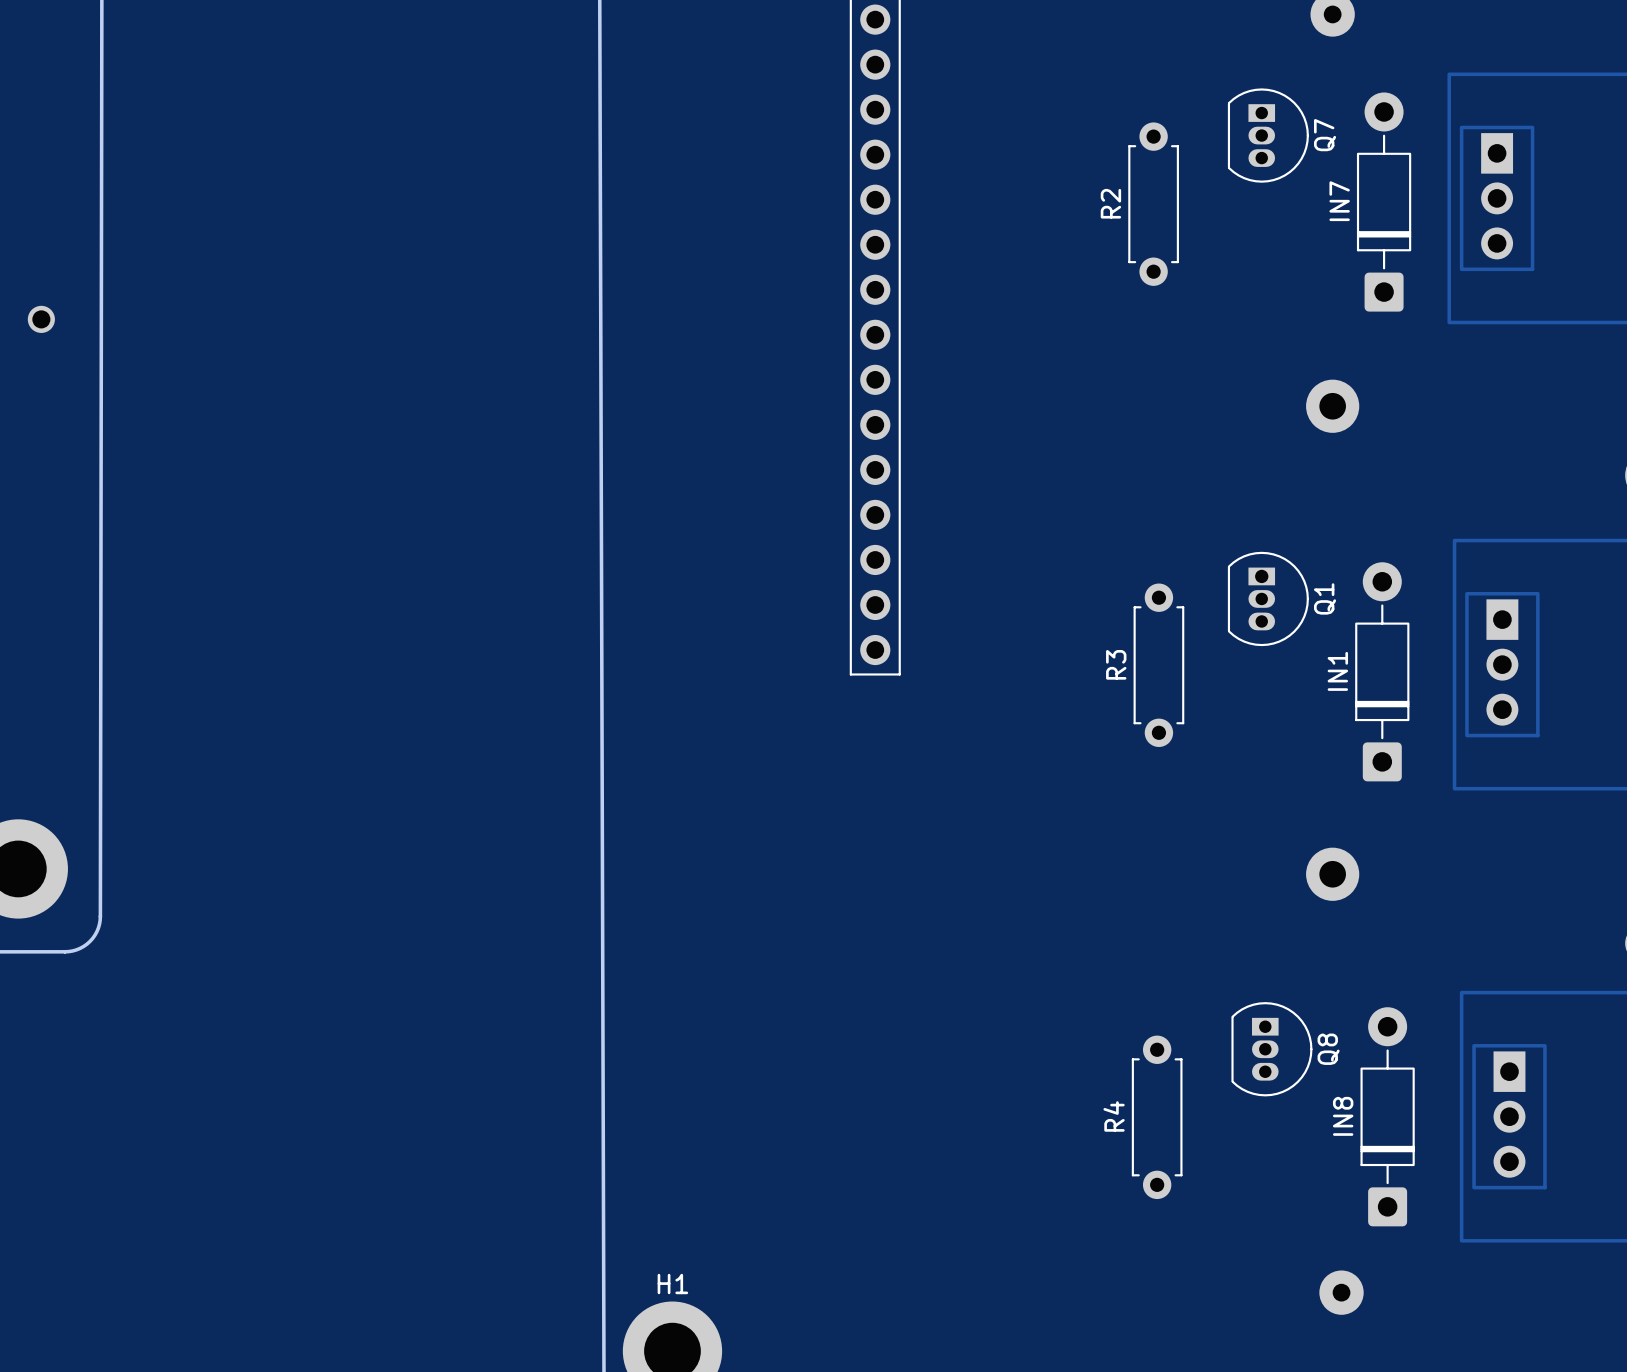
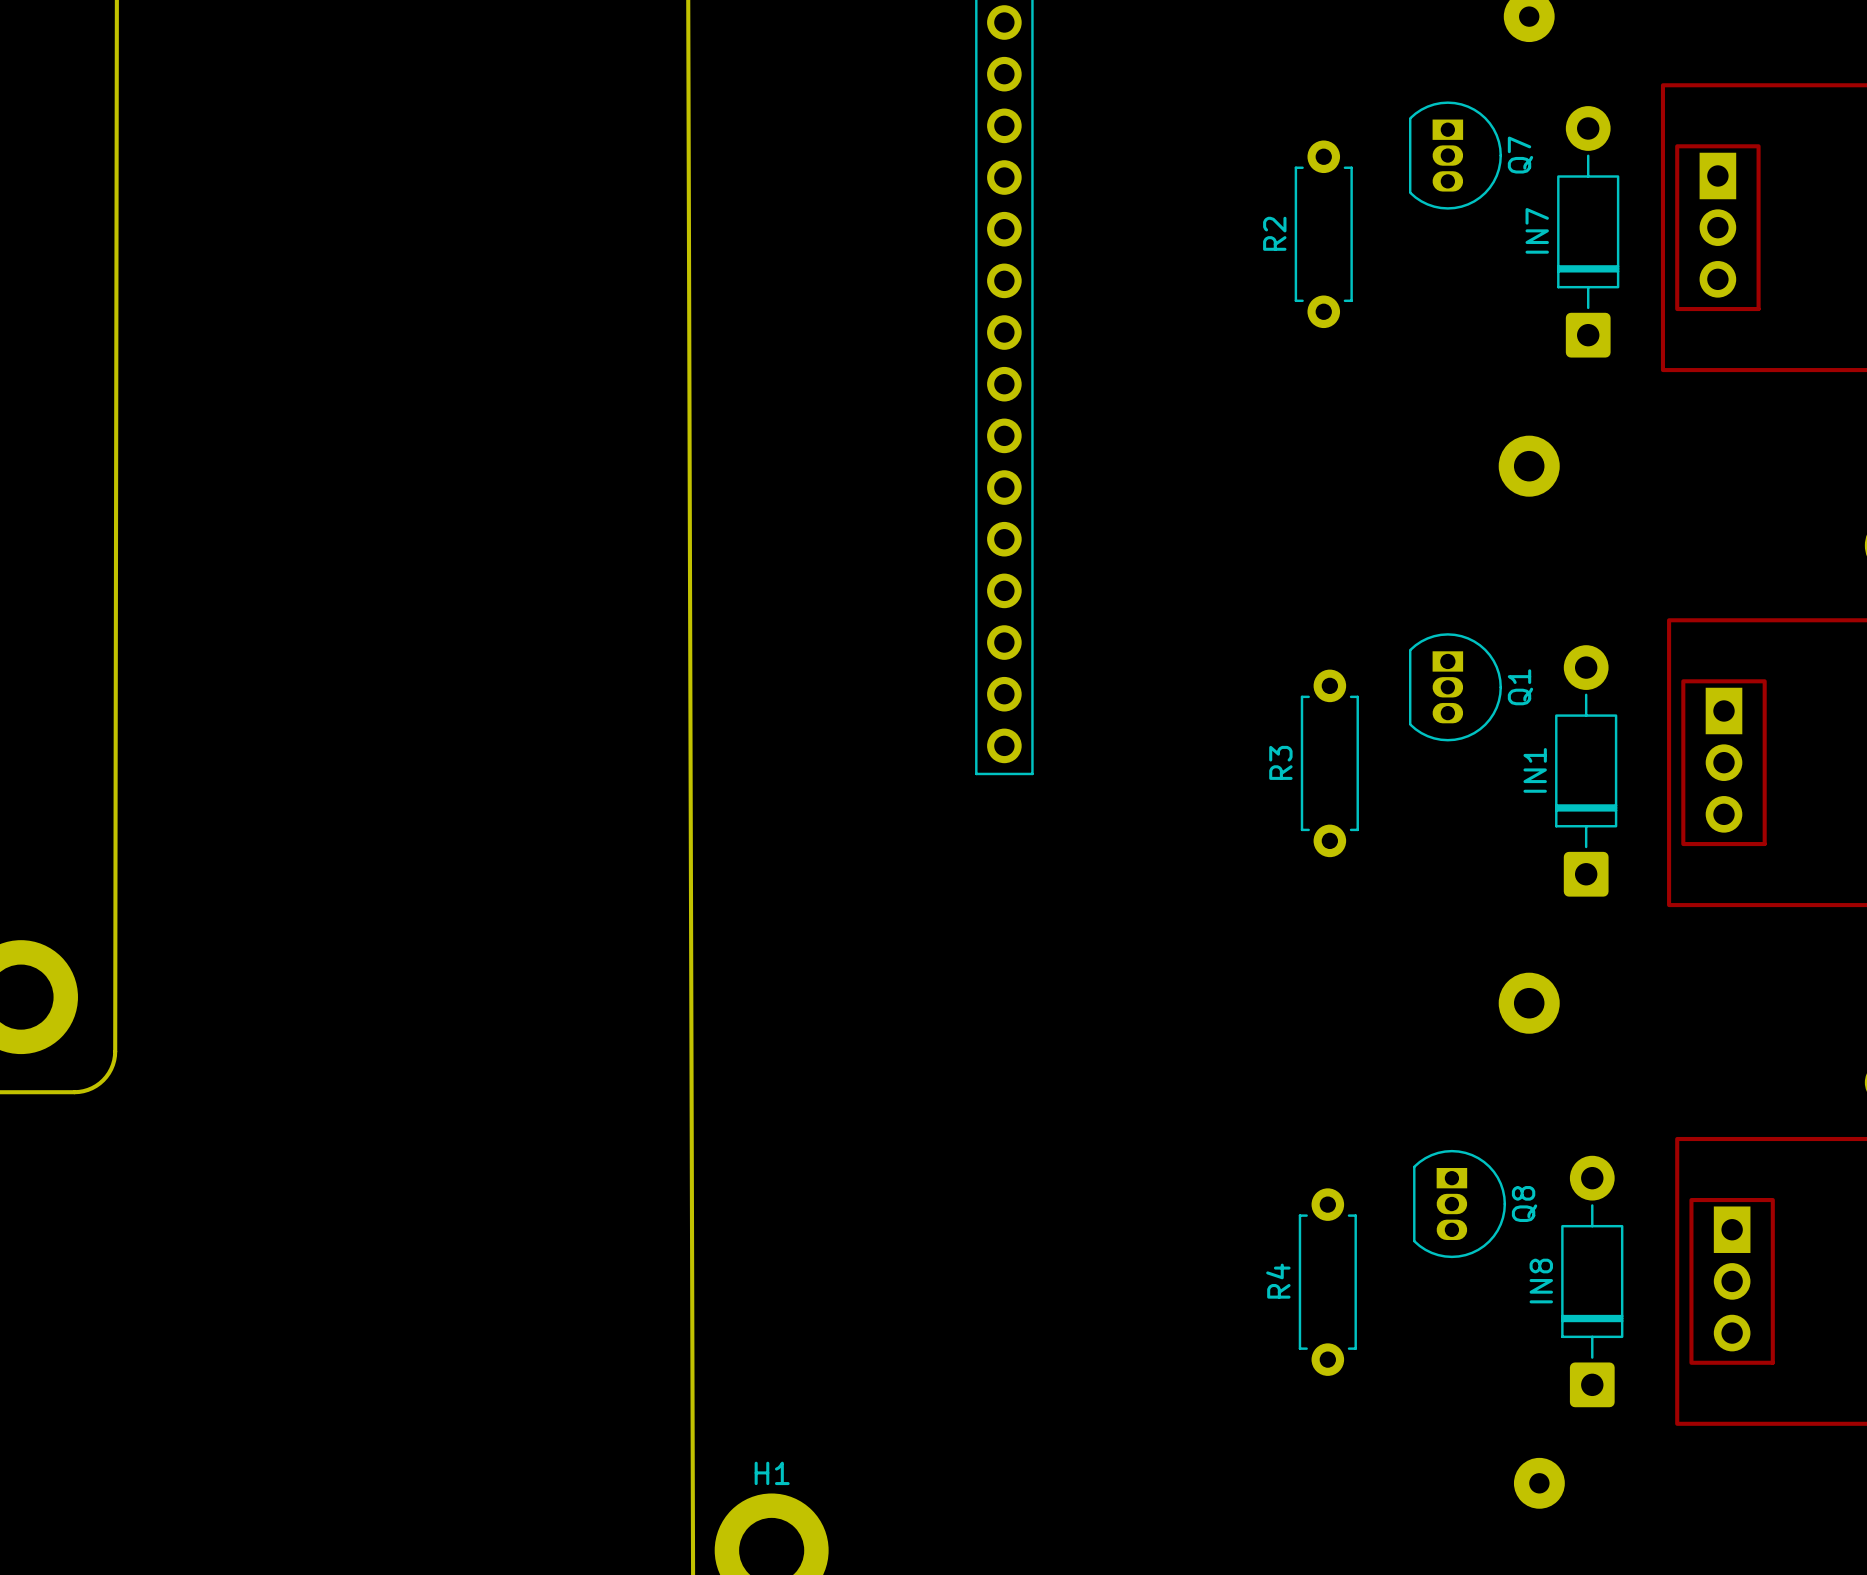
part: (41, 319) -> none

